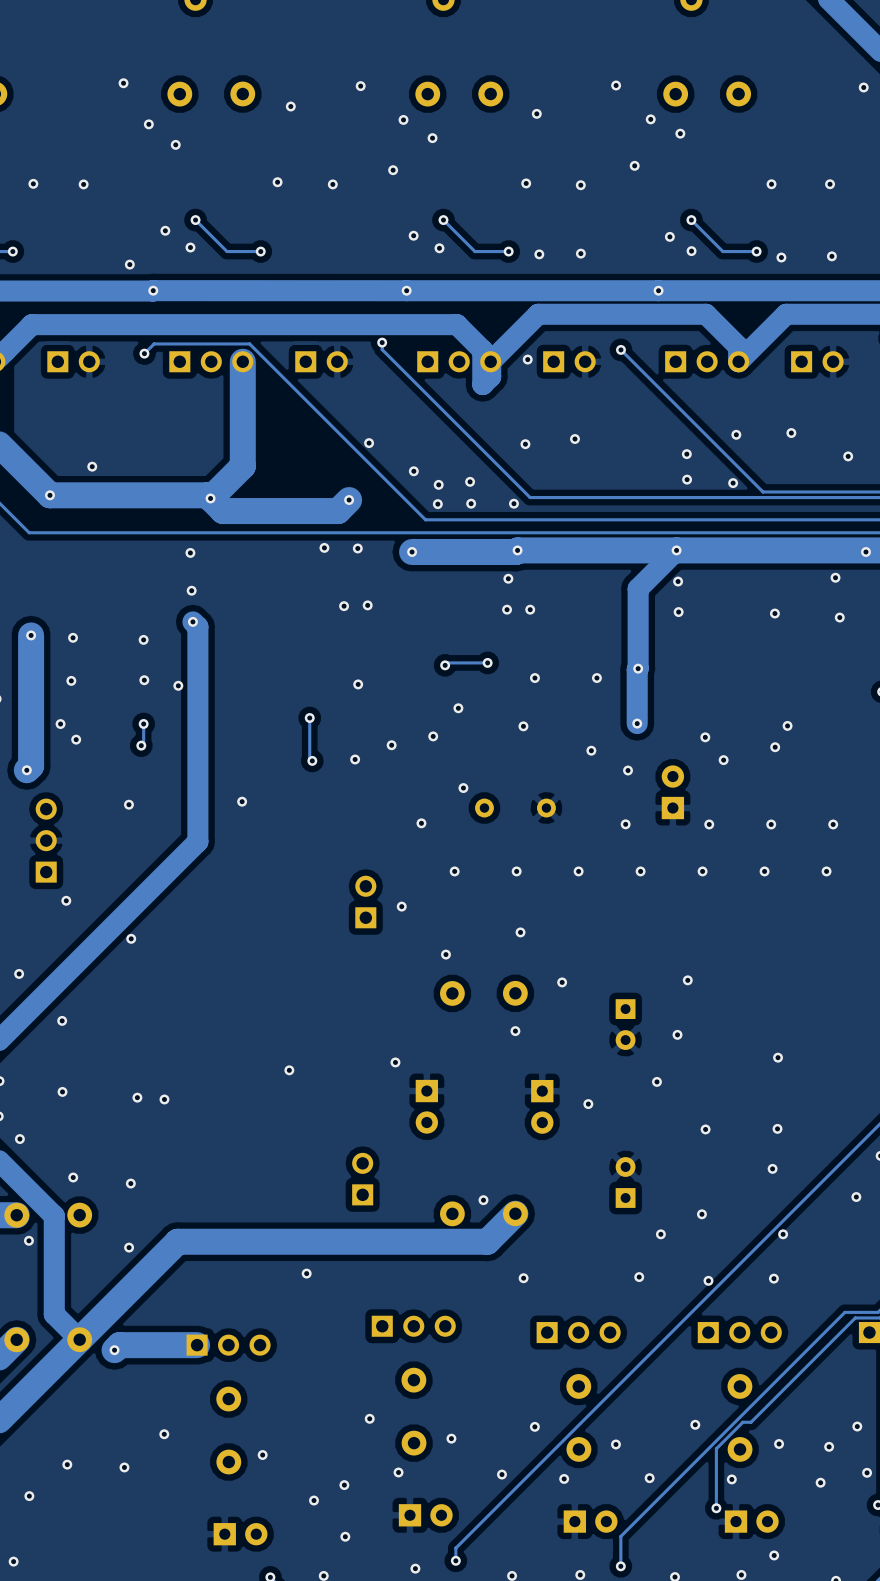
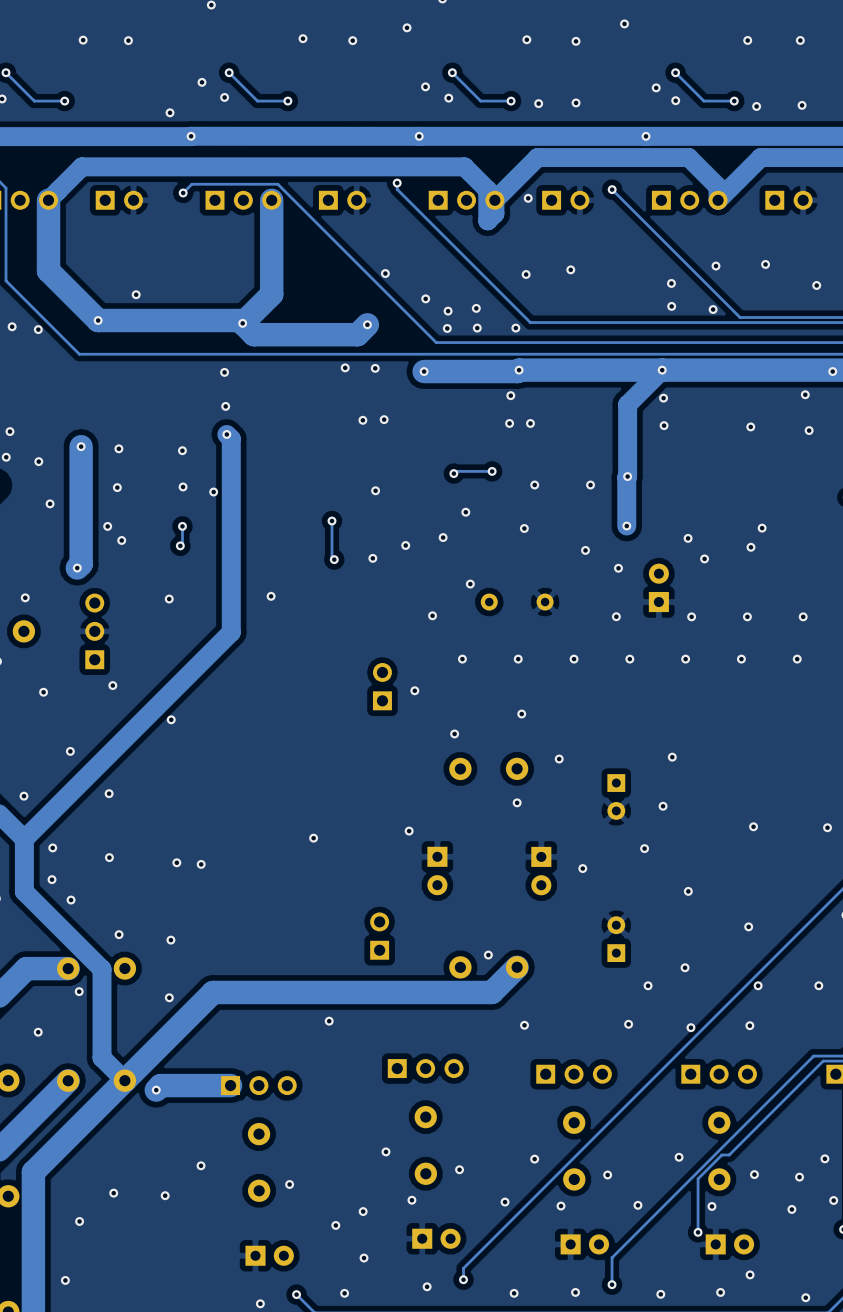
via: none -> (827, 827)
via: (777, 1128) -> none
via position: (856, 1197) -> (818, 985)

